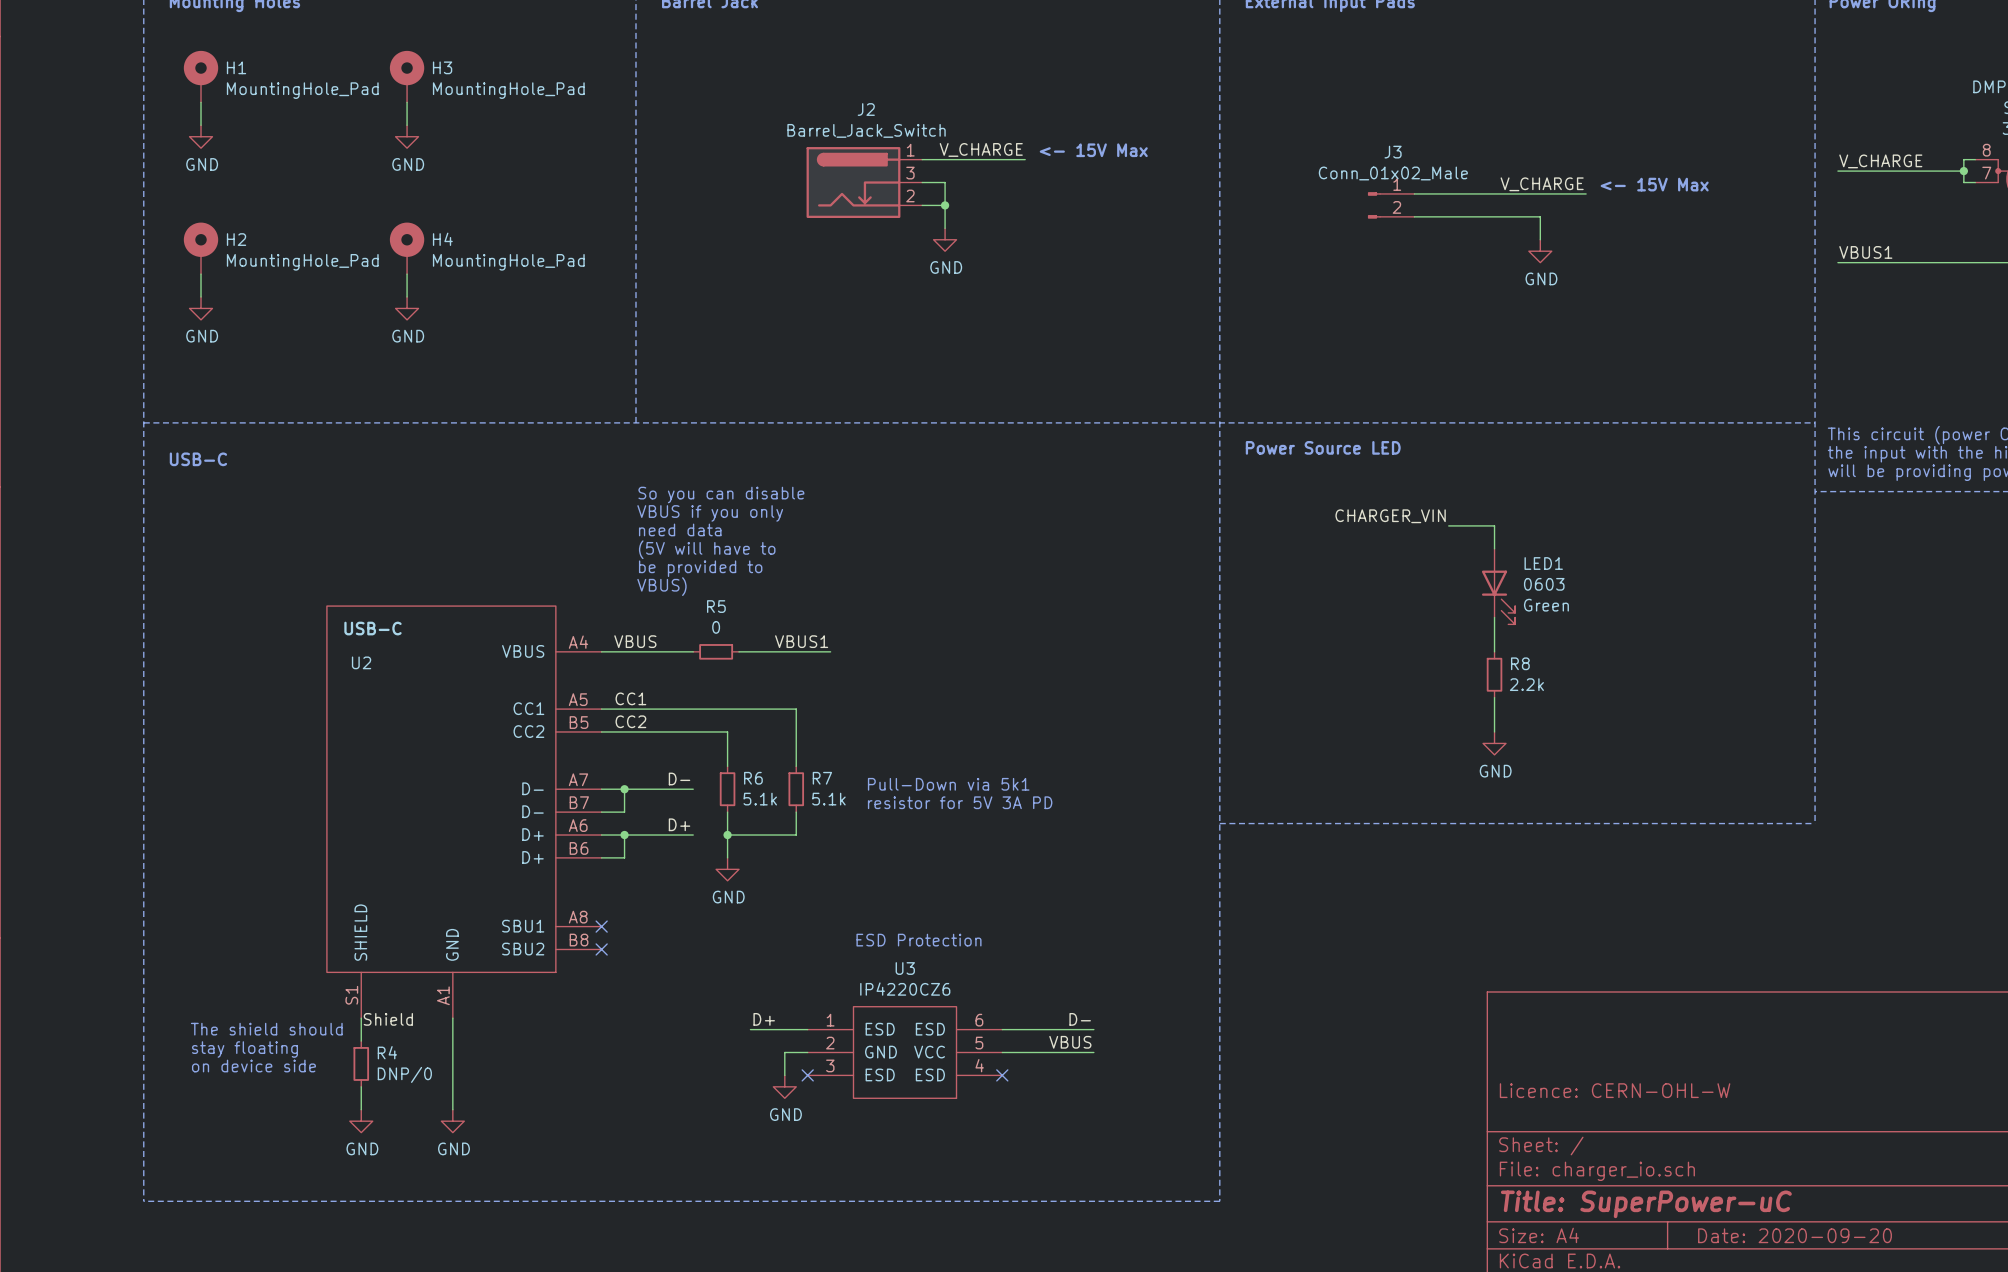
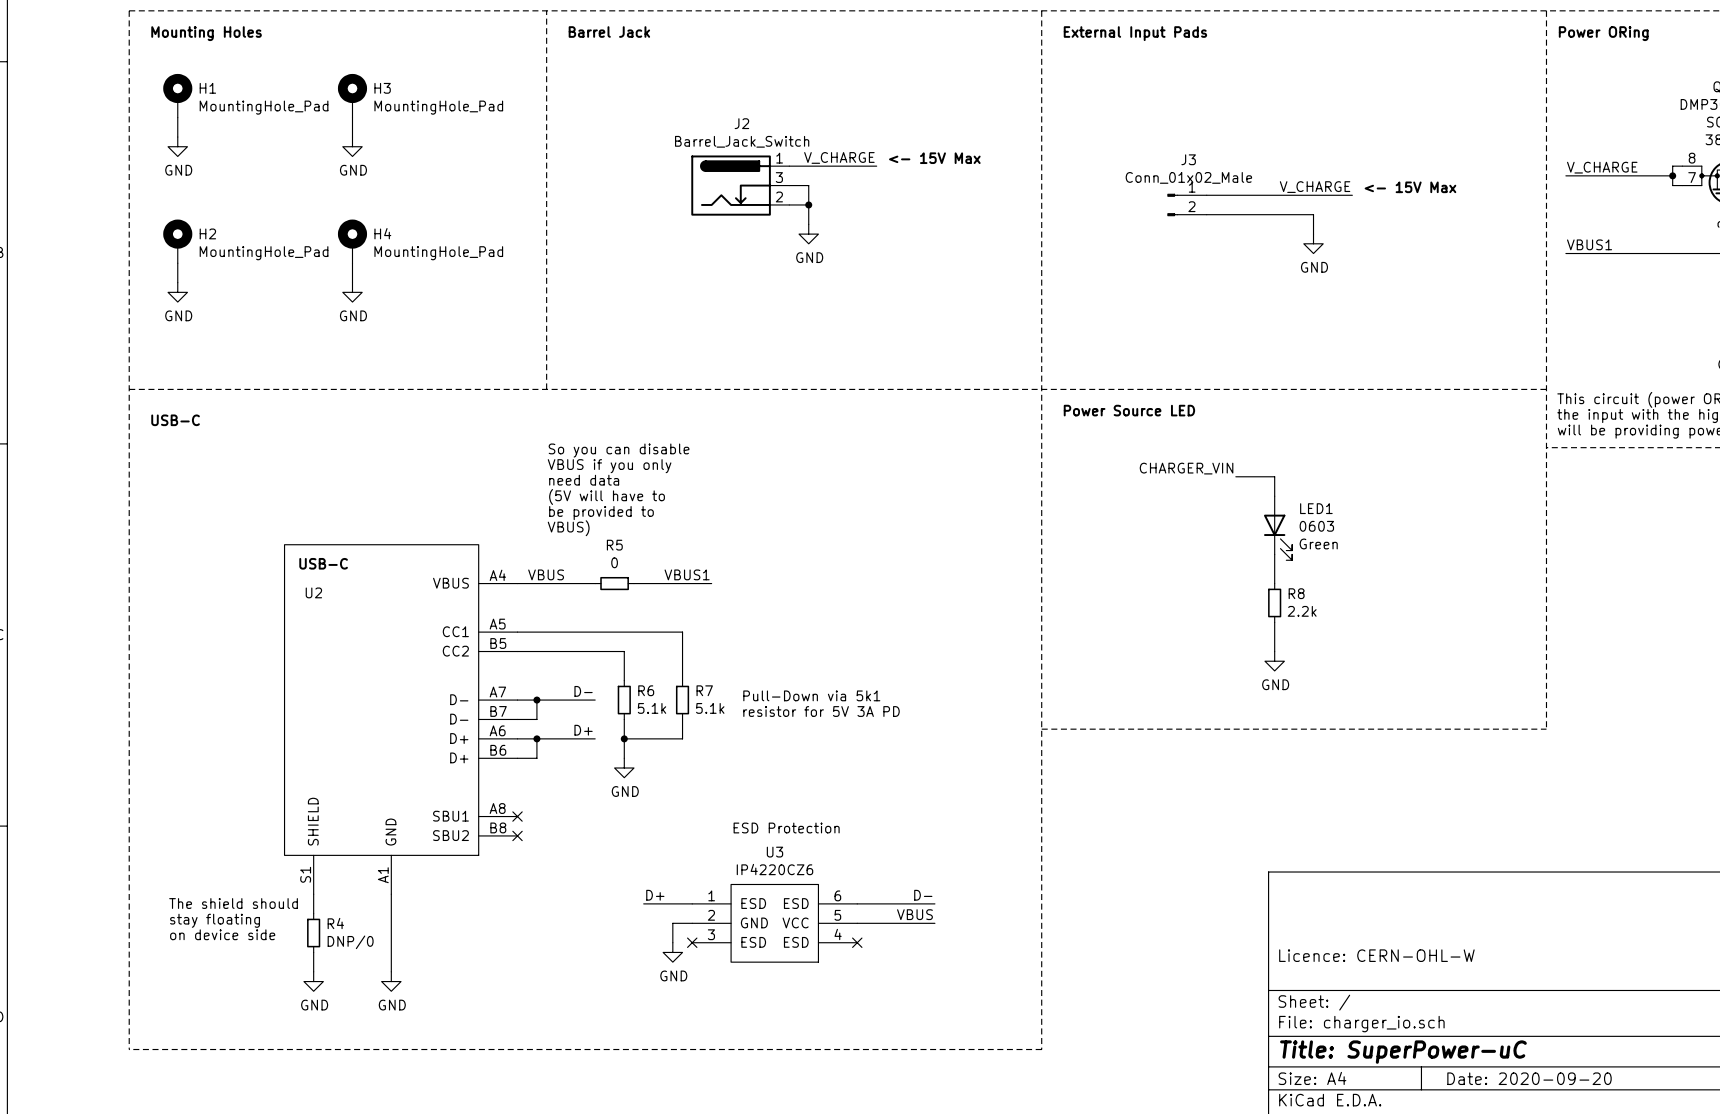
label: CC1 (630, 698) -> none
label: CC2 (630, 721) -> none
label: Shield (388, 1019) -> none

